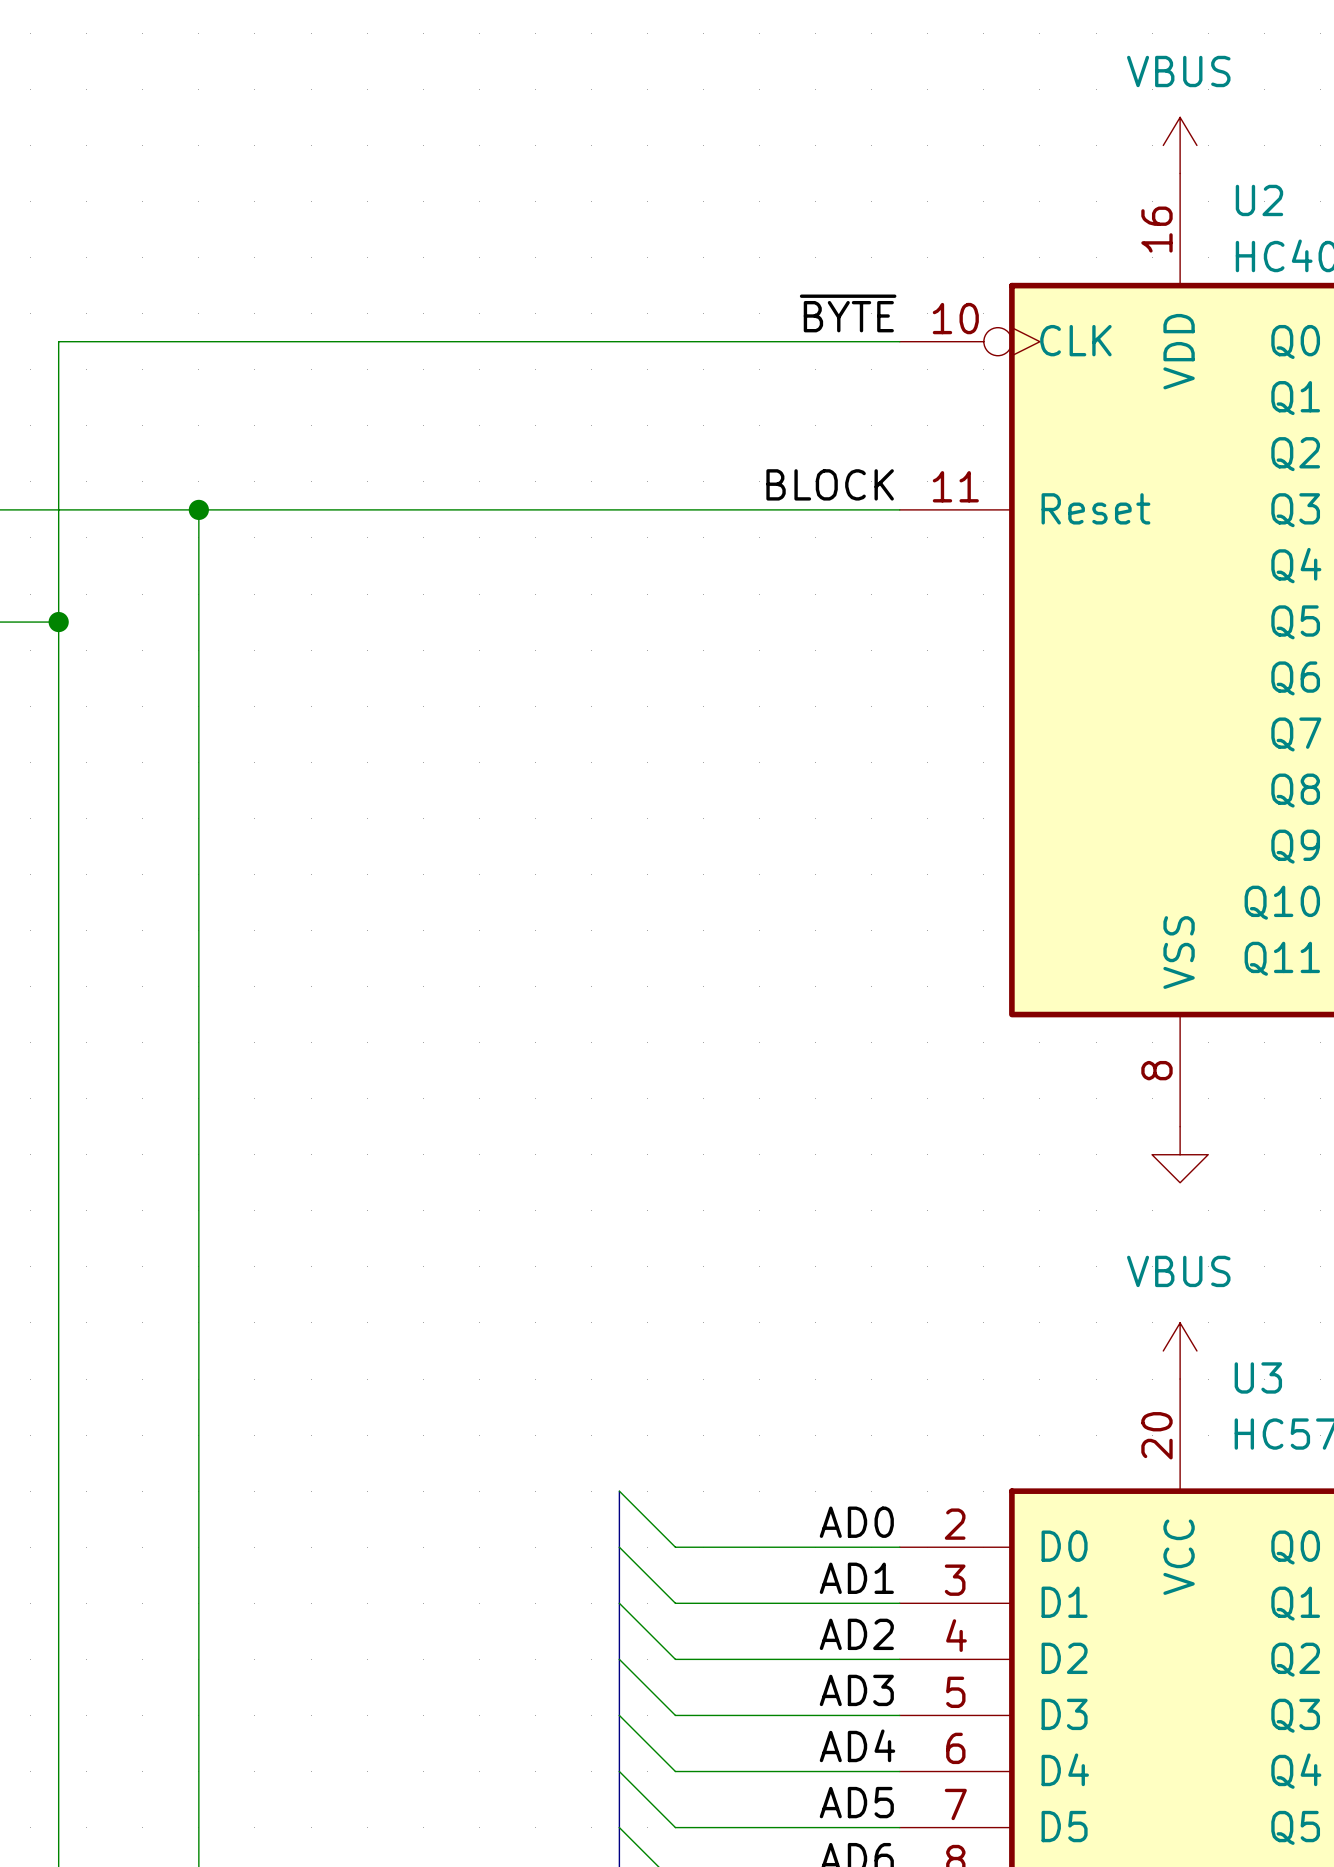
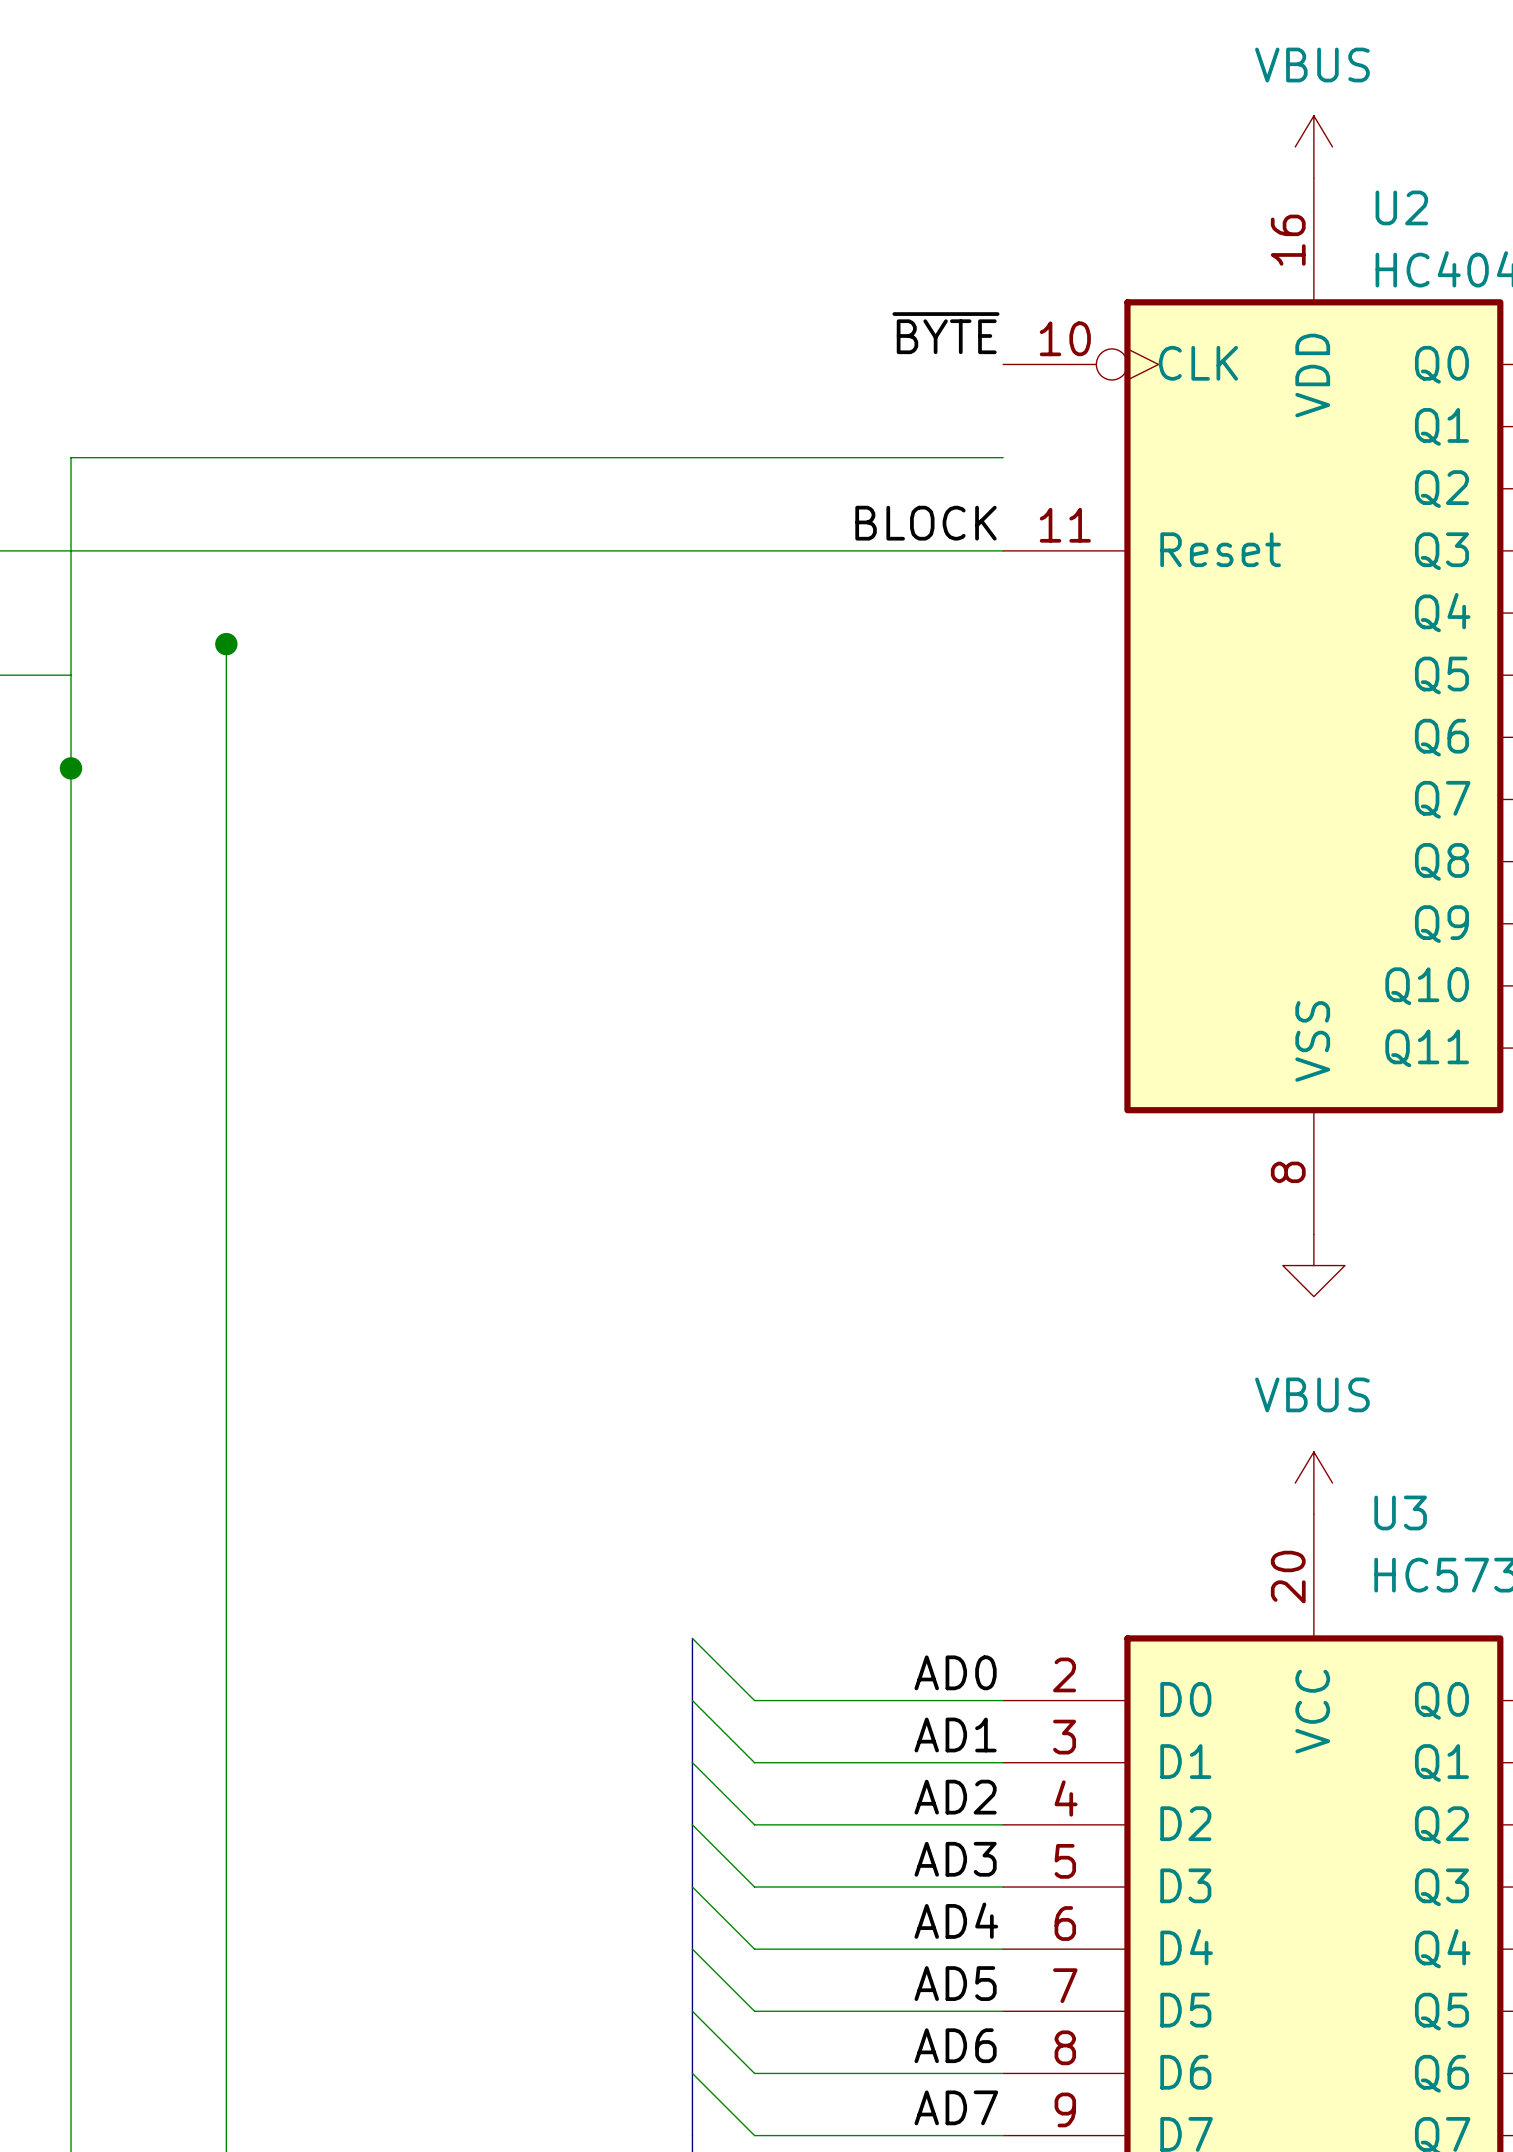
wire: (899, 341) (58, 341) (58, 425) -> (1003, 457) (70, 457)
wire: (198, 509) (198, 594) -> none
junction: (198, 509) -> none
junction: none -> (226, 644)
junction: (58, 622) -> none
junction: none -> (70, 768)

